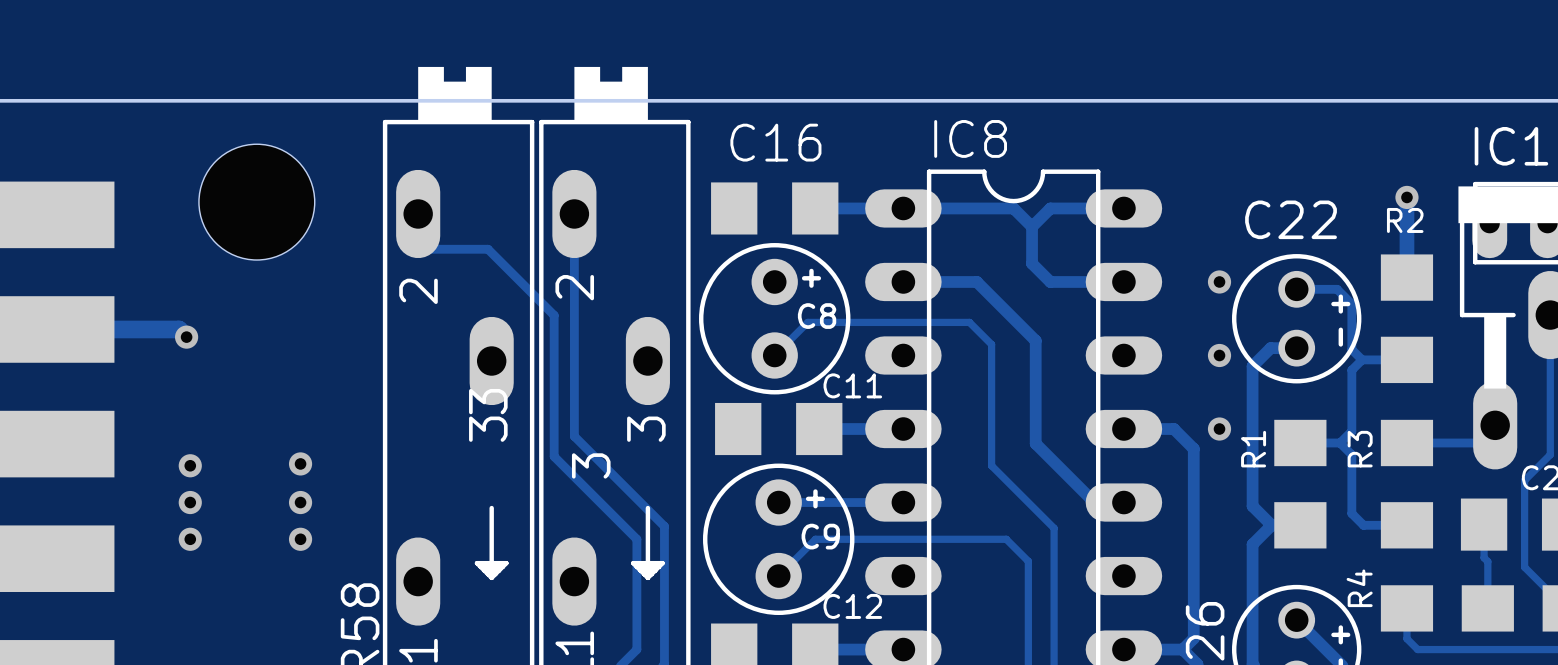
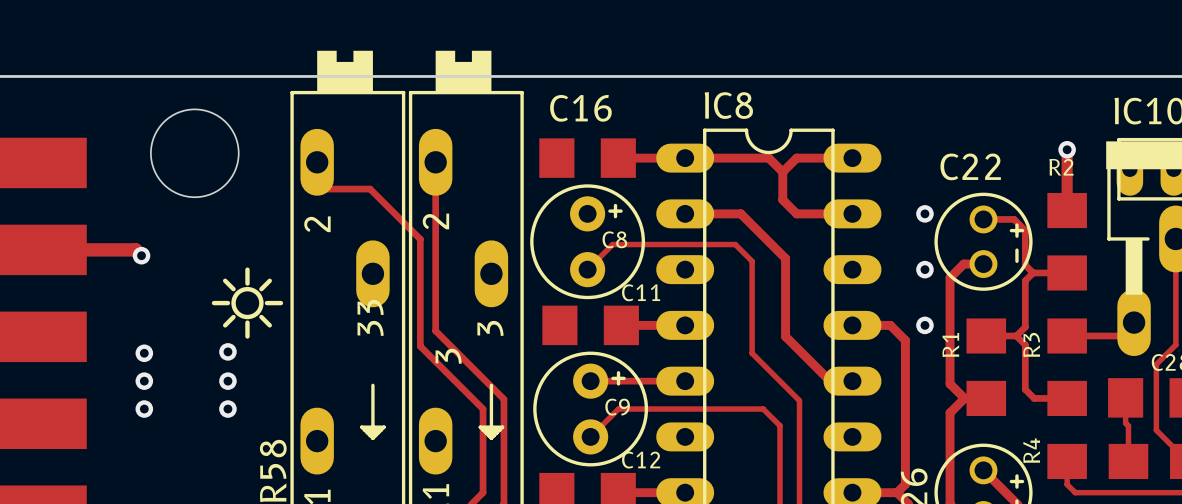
line: none -> (247, 269) (247, 283)
line: none -> (225, 280) (233, 289)
line: none -> (269, 280) (261, 289)
drawing: none -> [231, 286, 264, 320]
line: none -> (214, 303) (227, 303)
line: none -> (266, 303) (280, 303)
line: none -> (233, 317) (225, 325)
line: none -> (261, 317) (269, 325)
line: none -> (247, 322) (247, 336)

